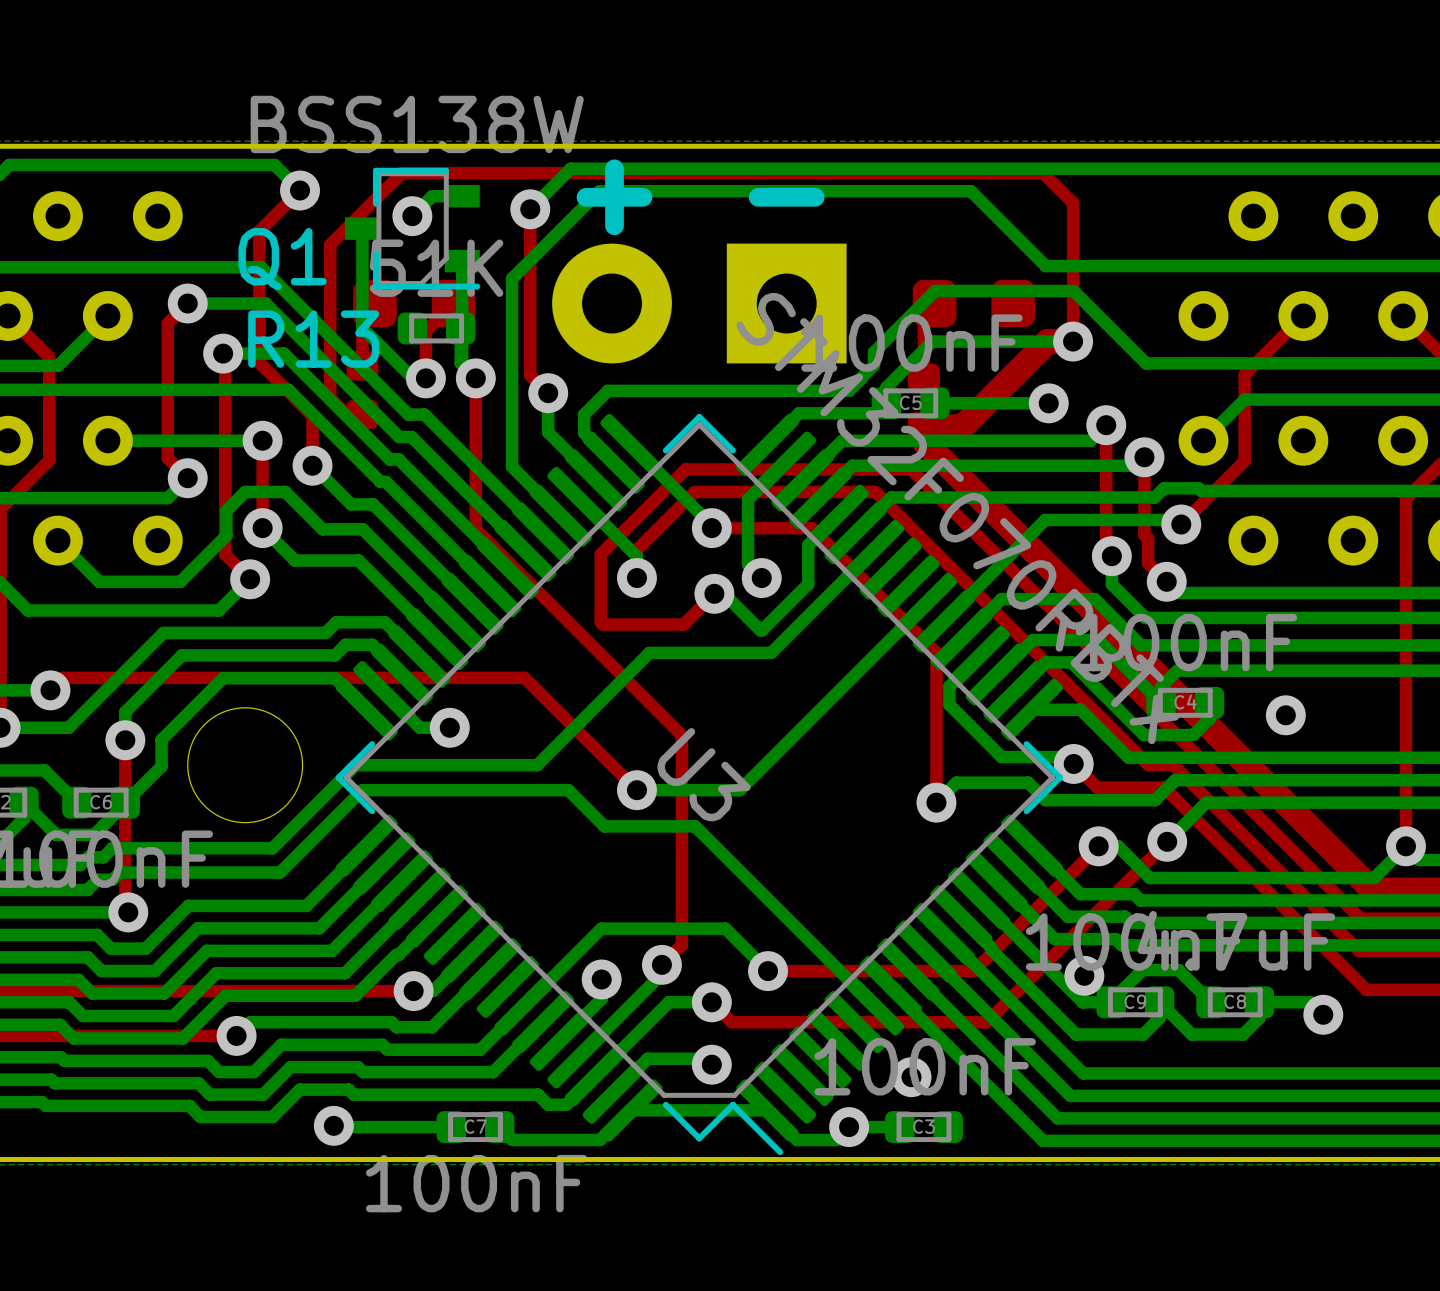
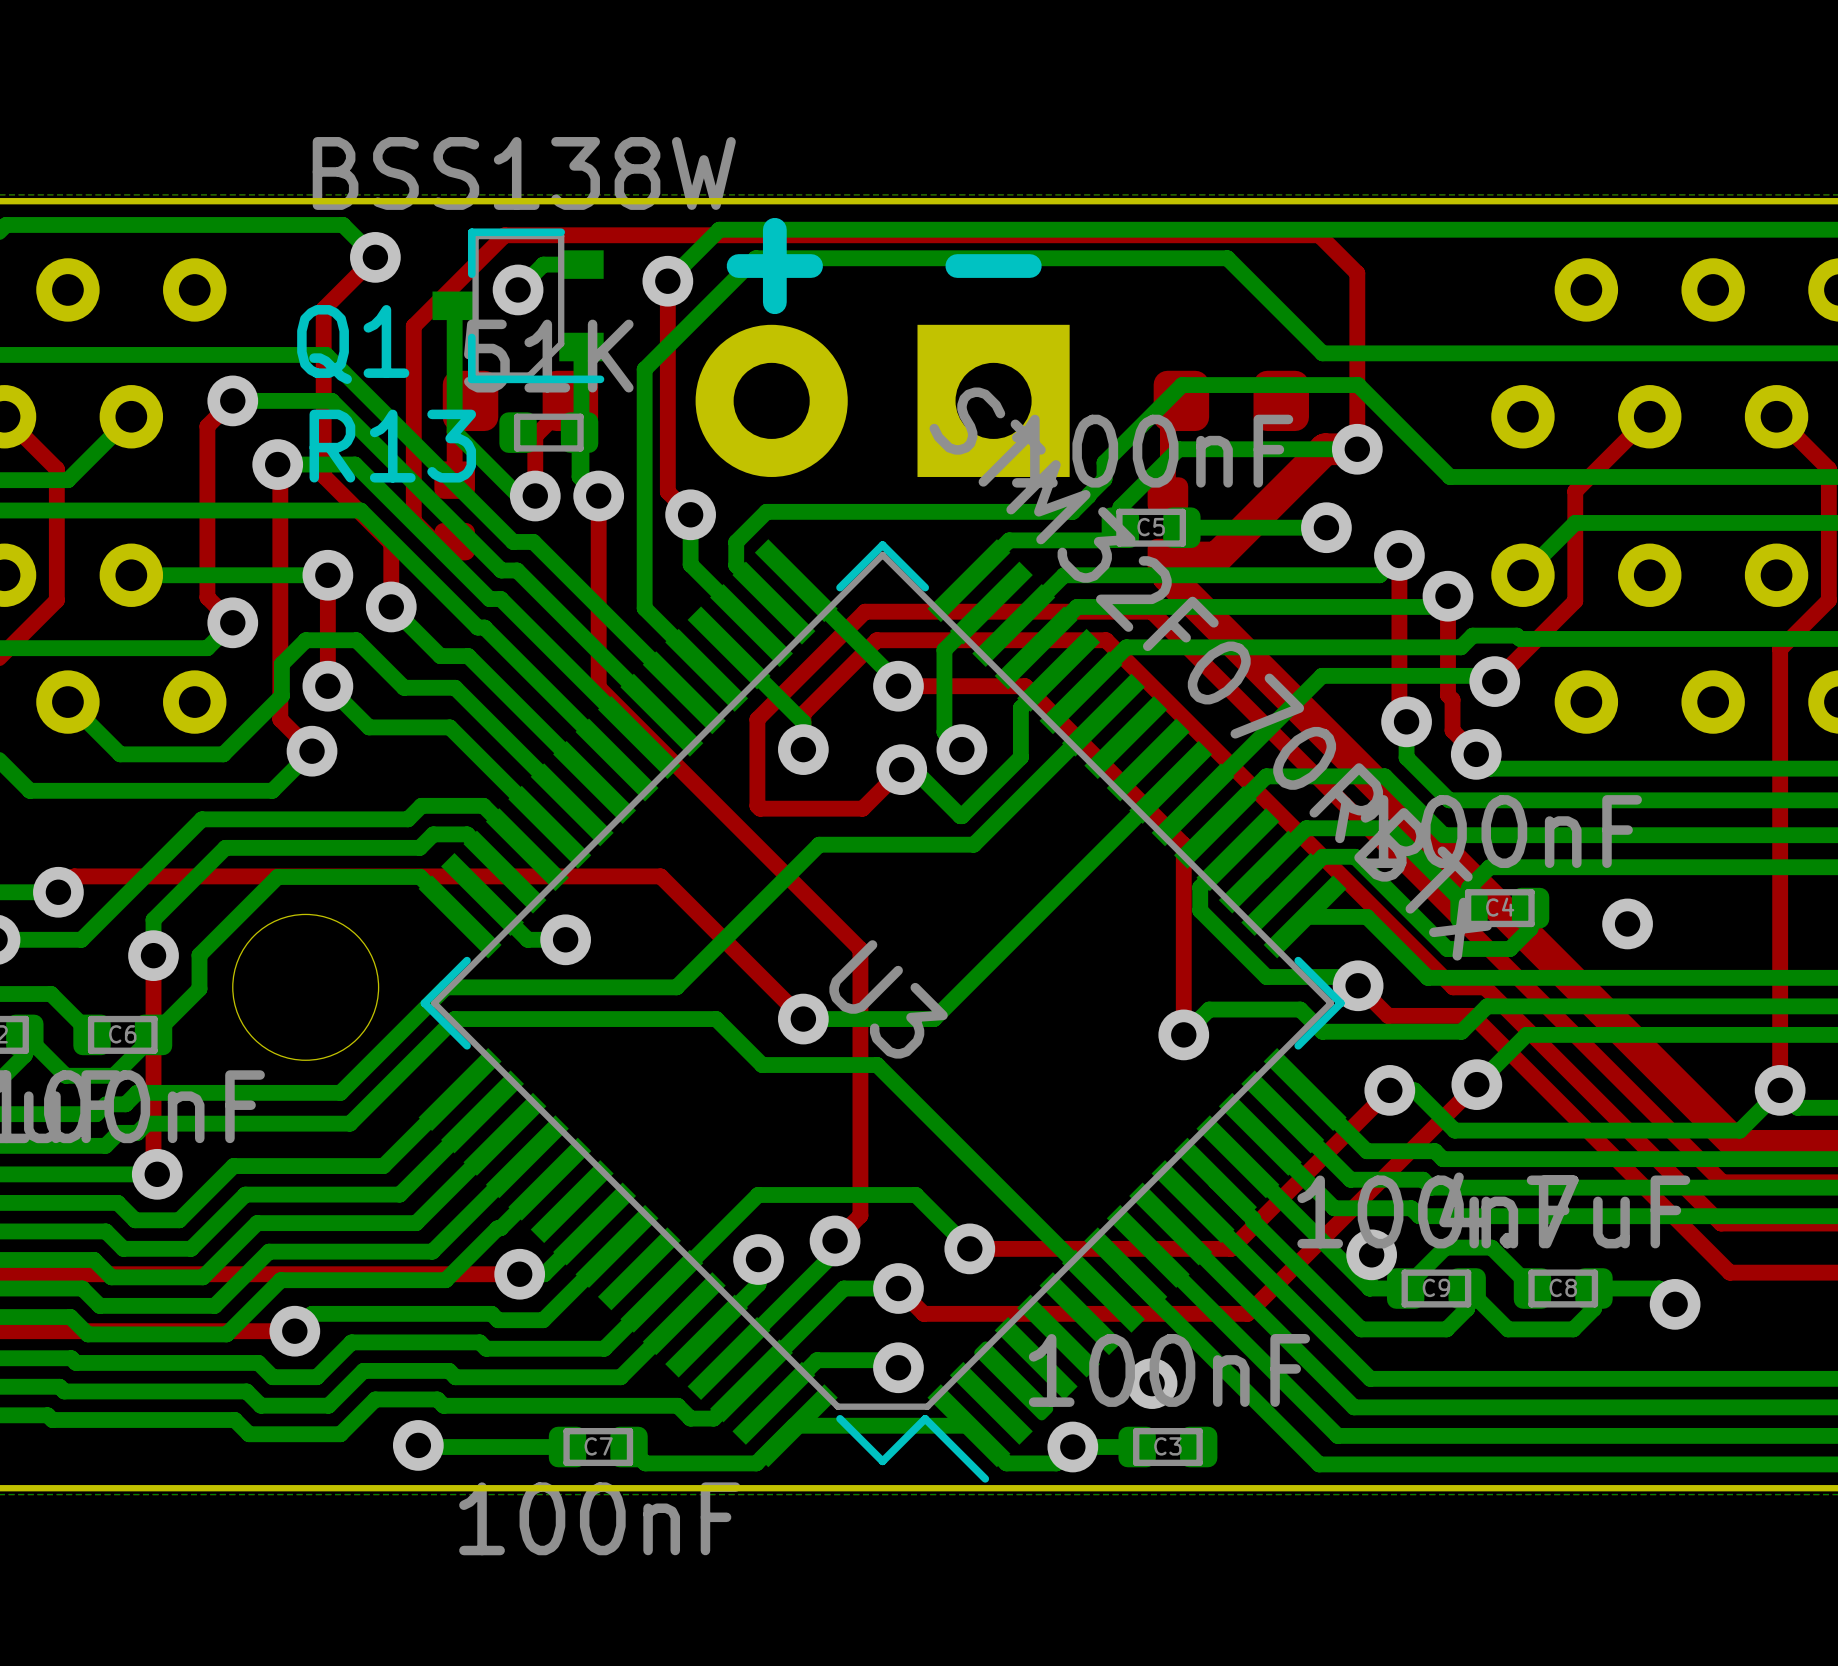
U3 footprint: [335, 413, 1064, 1156] -> [418, 539, 1347, 1483]

